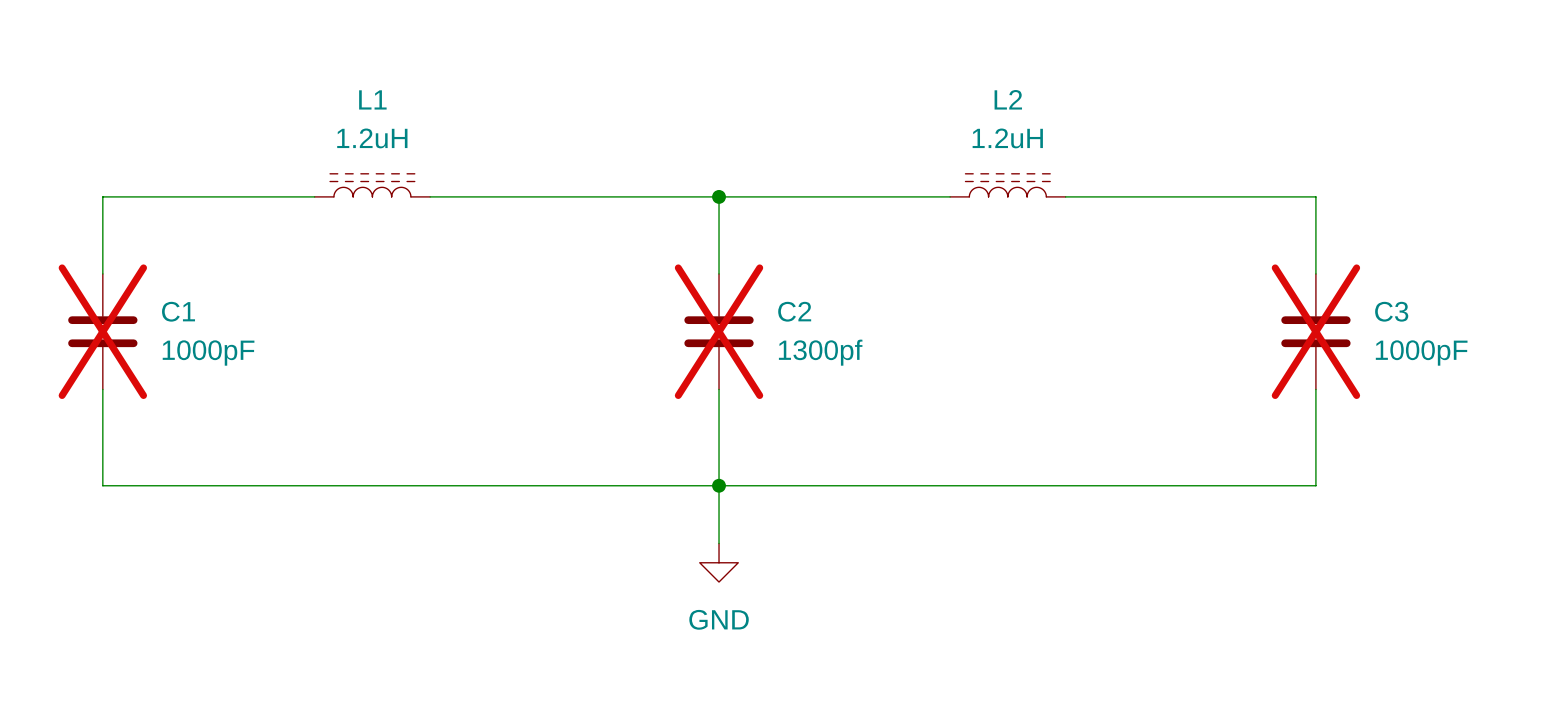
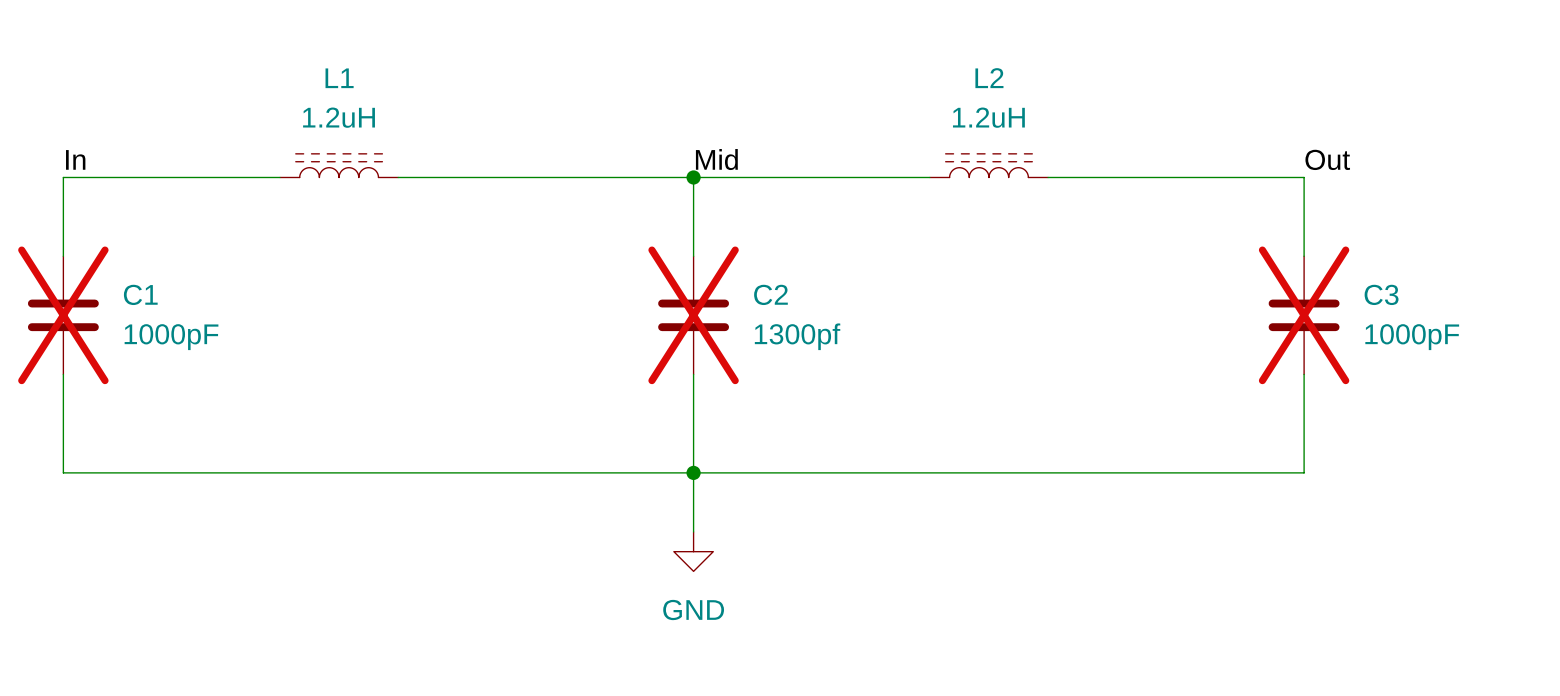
label: none -> In (75, 159)
label: none -> Mid (716, 159)
label: none -> Out (1327, 159)

